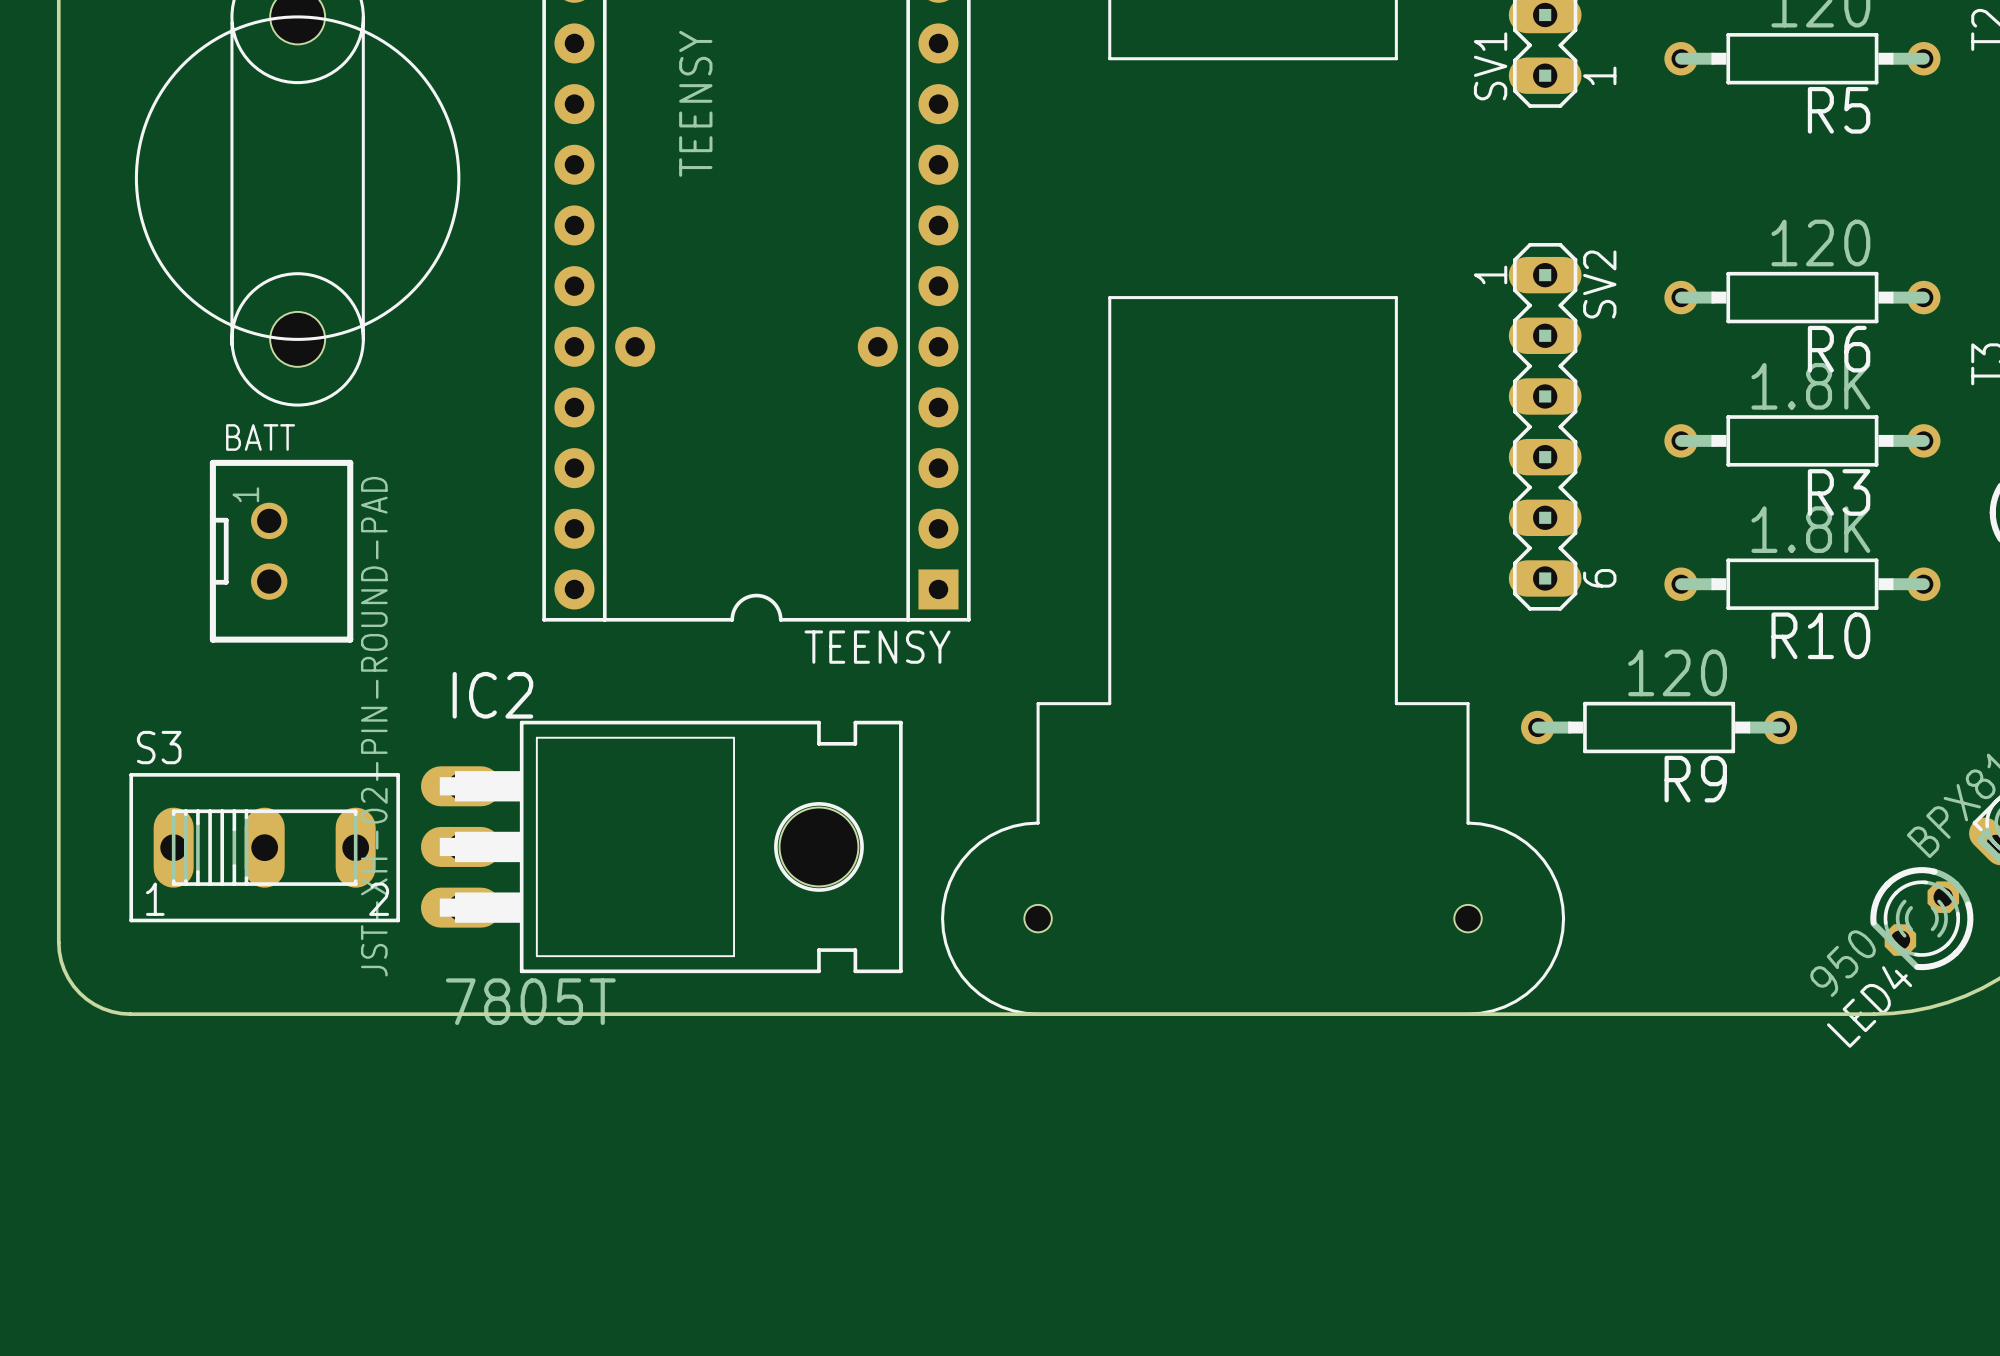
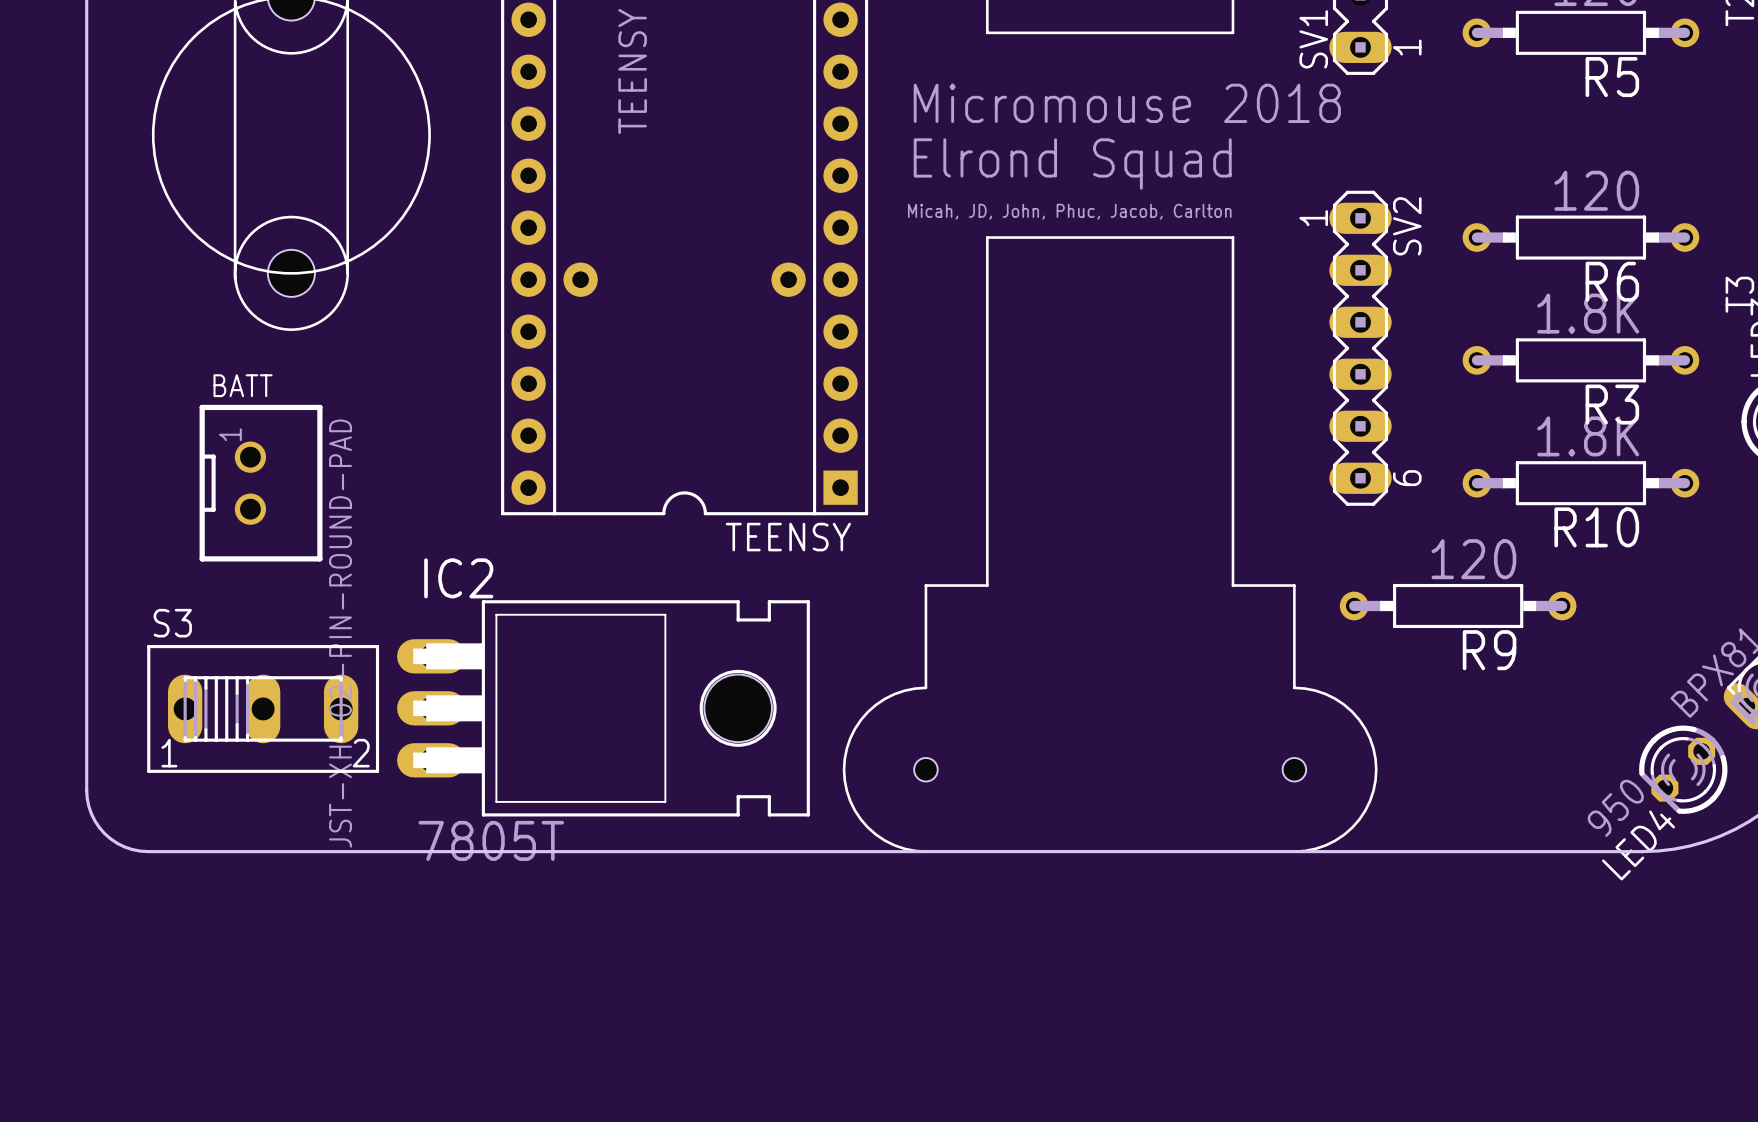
text: none -> Micromouse 2018 (1127, 103)
text: none -> Elrond Squad (1072, 164)
text: none -> Micah, JD, John, Phuc, Jacob, Carlton (1069, 211)
BATT position: (281, 551) -> (261, 483)

